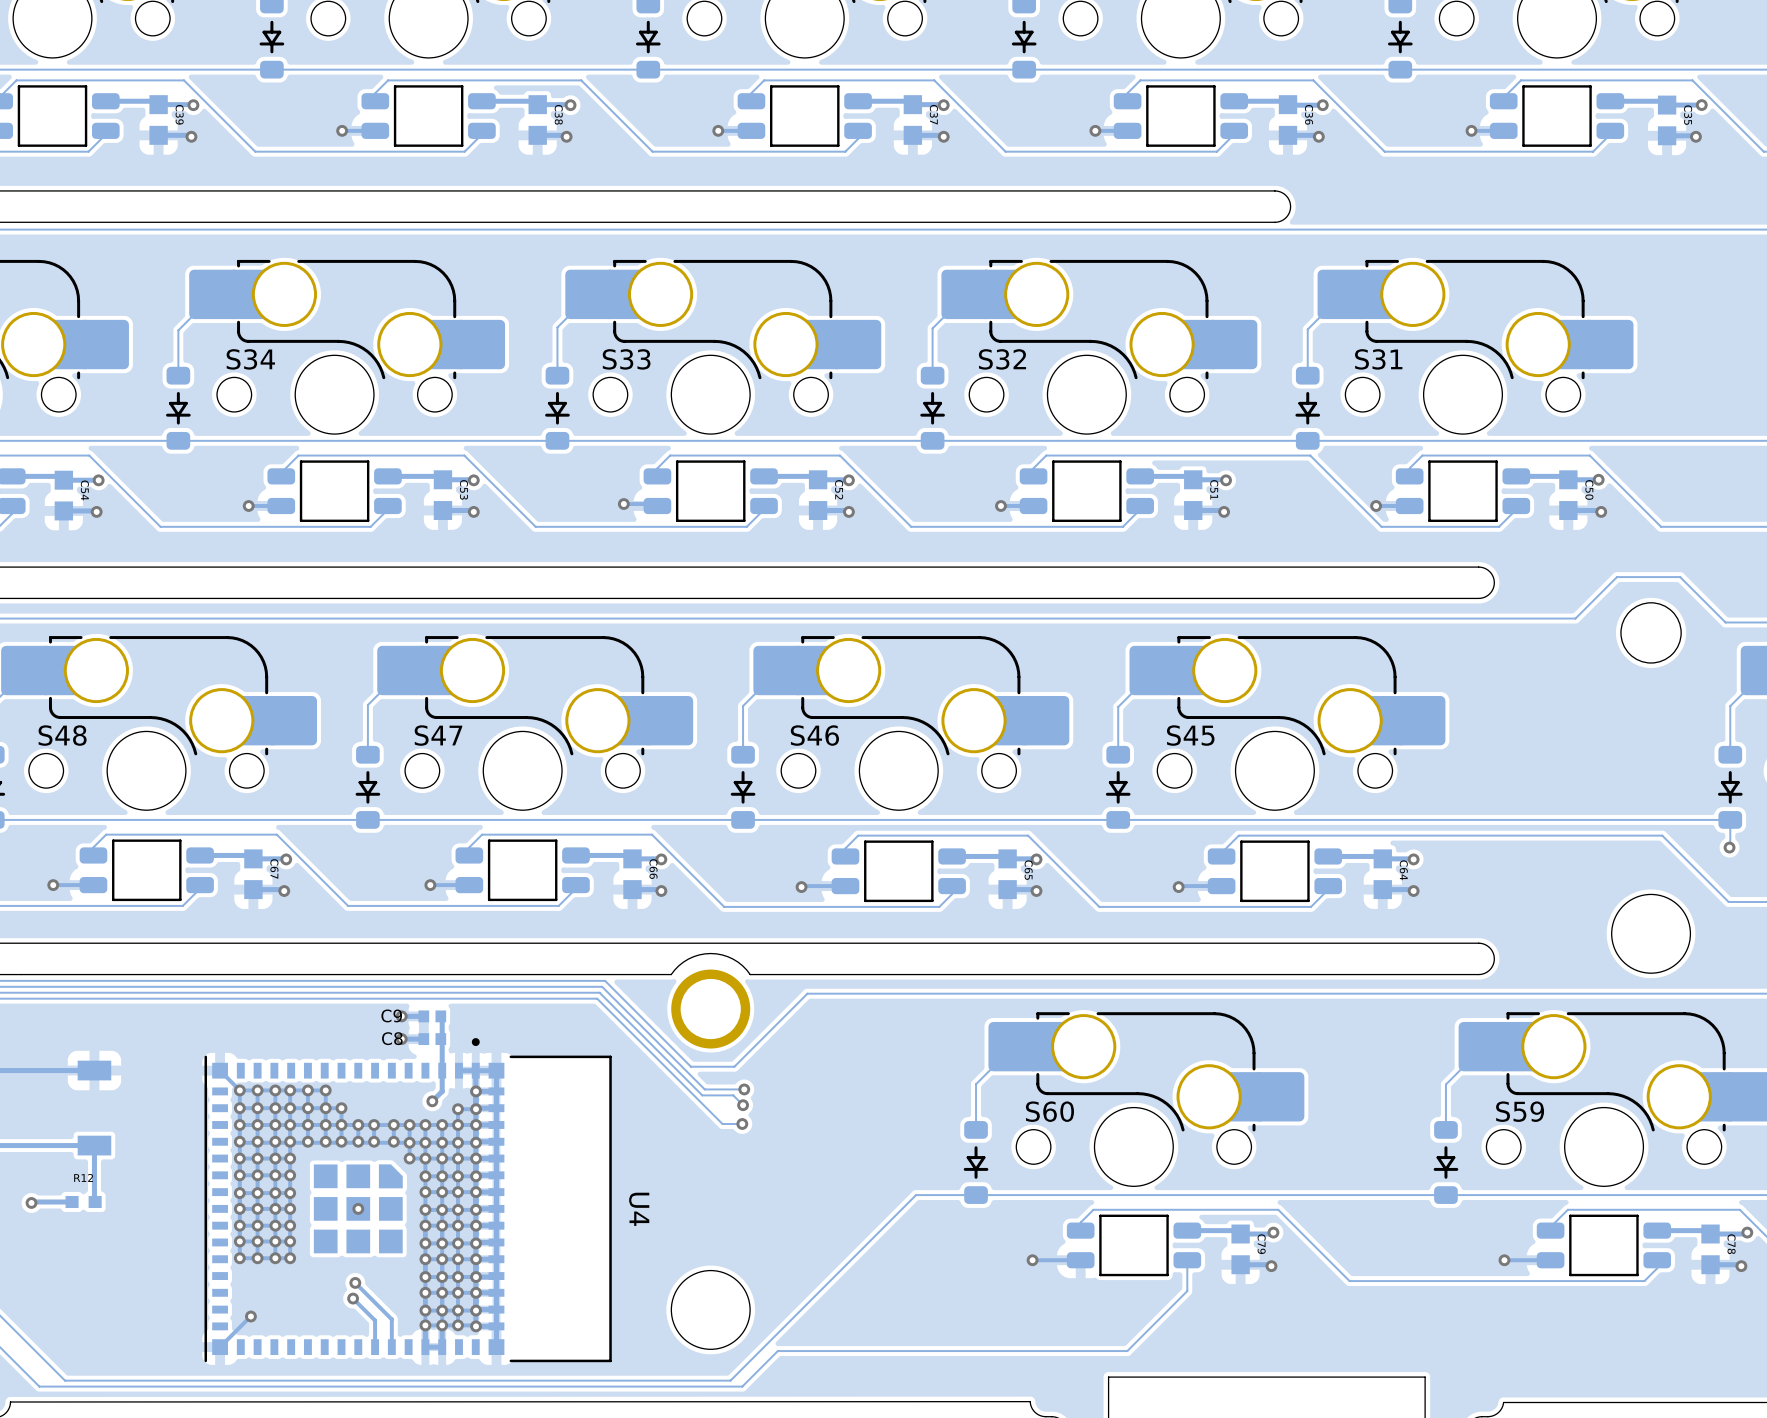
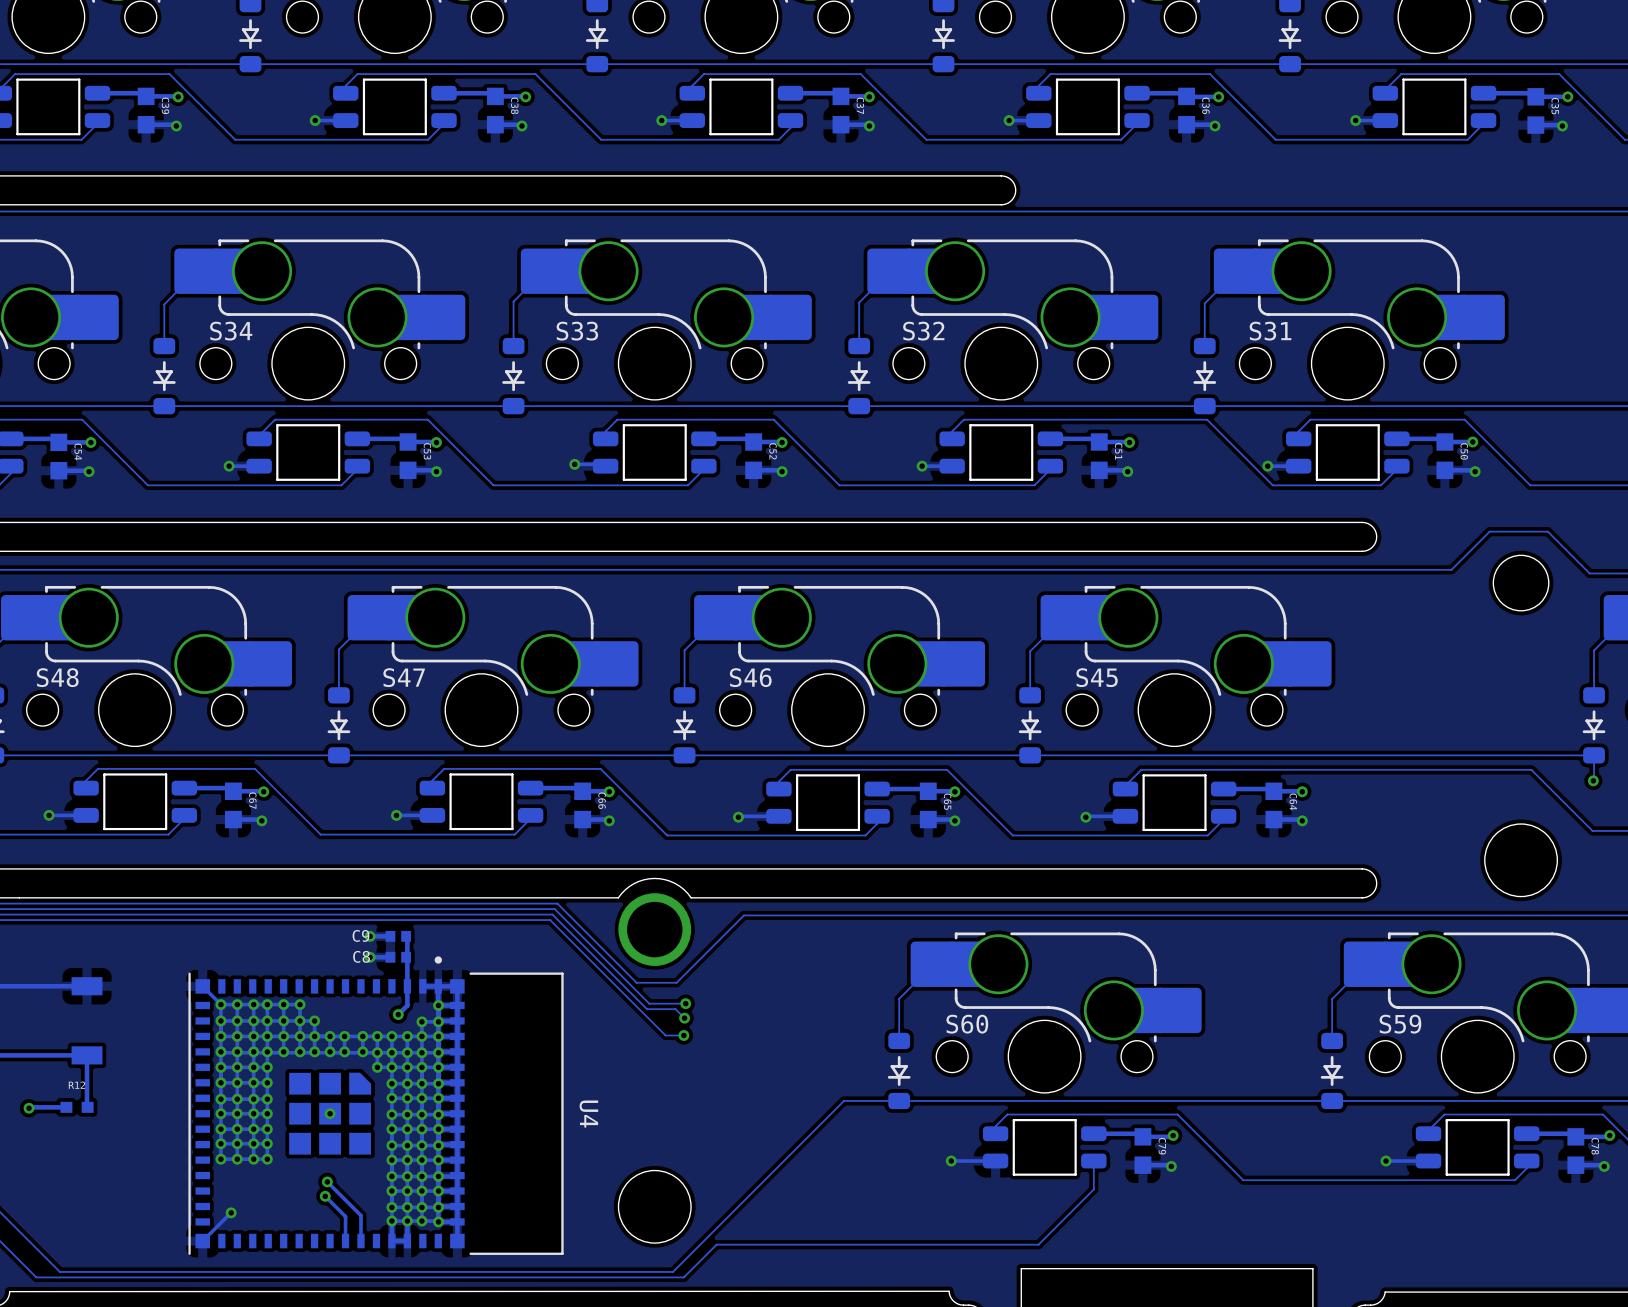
board edge: (1086, 190) (1276, 191) (1286, 196) (1290, 206) (1286, 217) (1276, 222) (1086, 222) -> (1001, 175) (1011, 180) (1015, 190) (1011, 200) (1001, 204)

